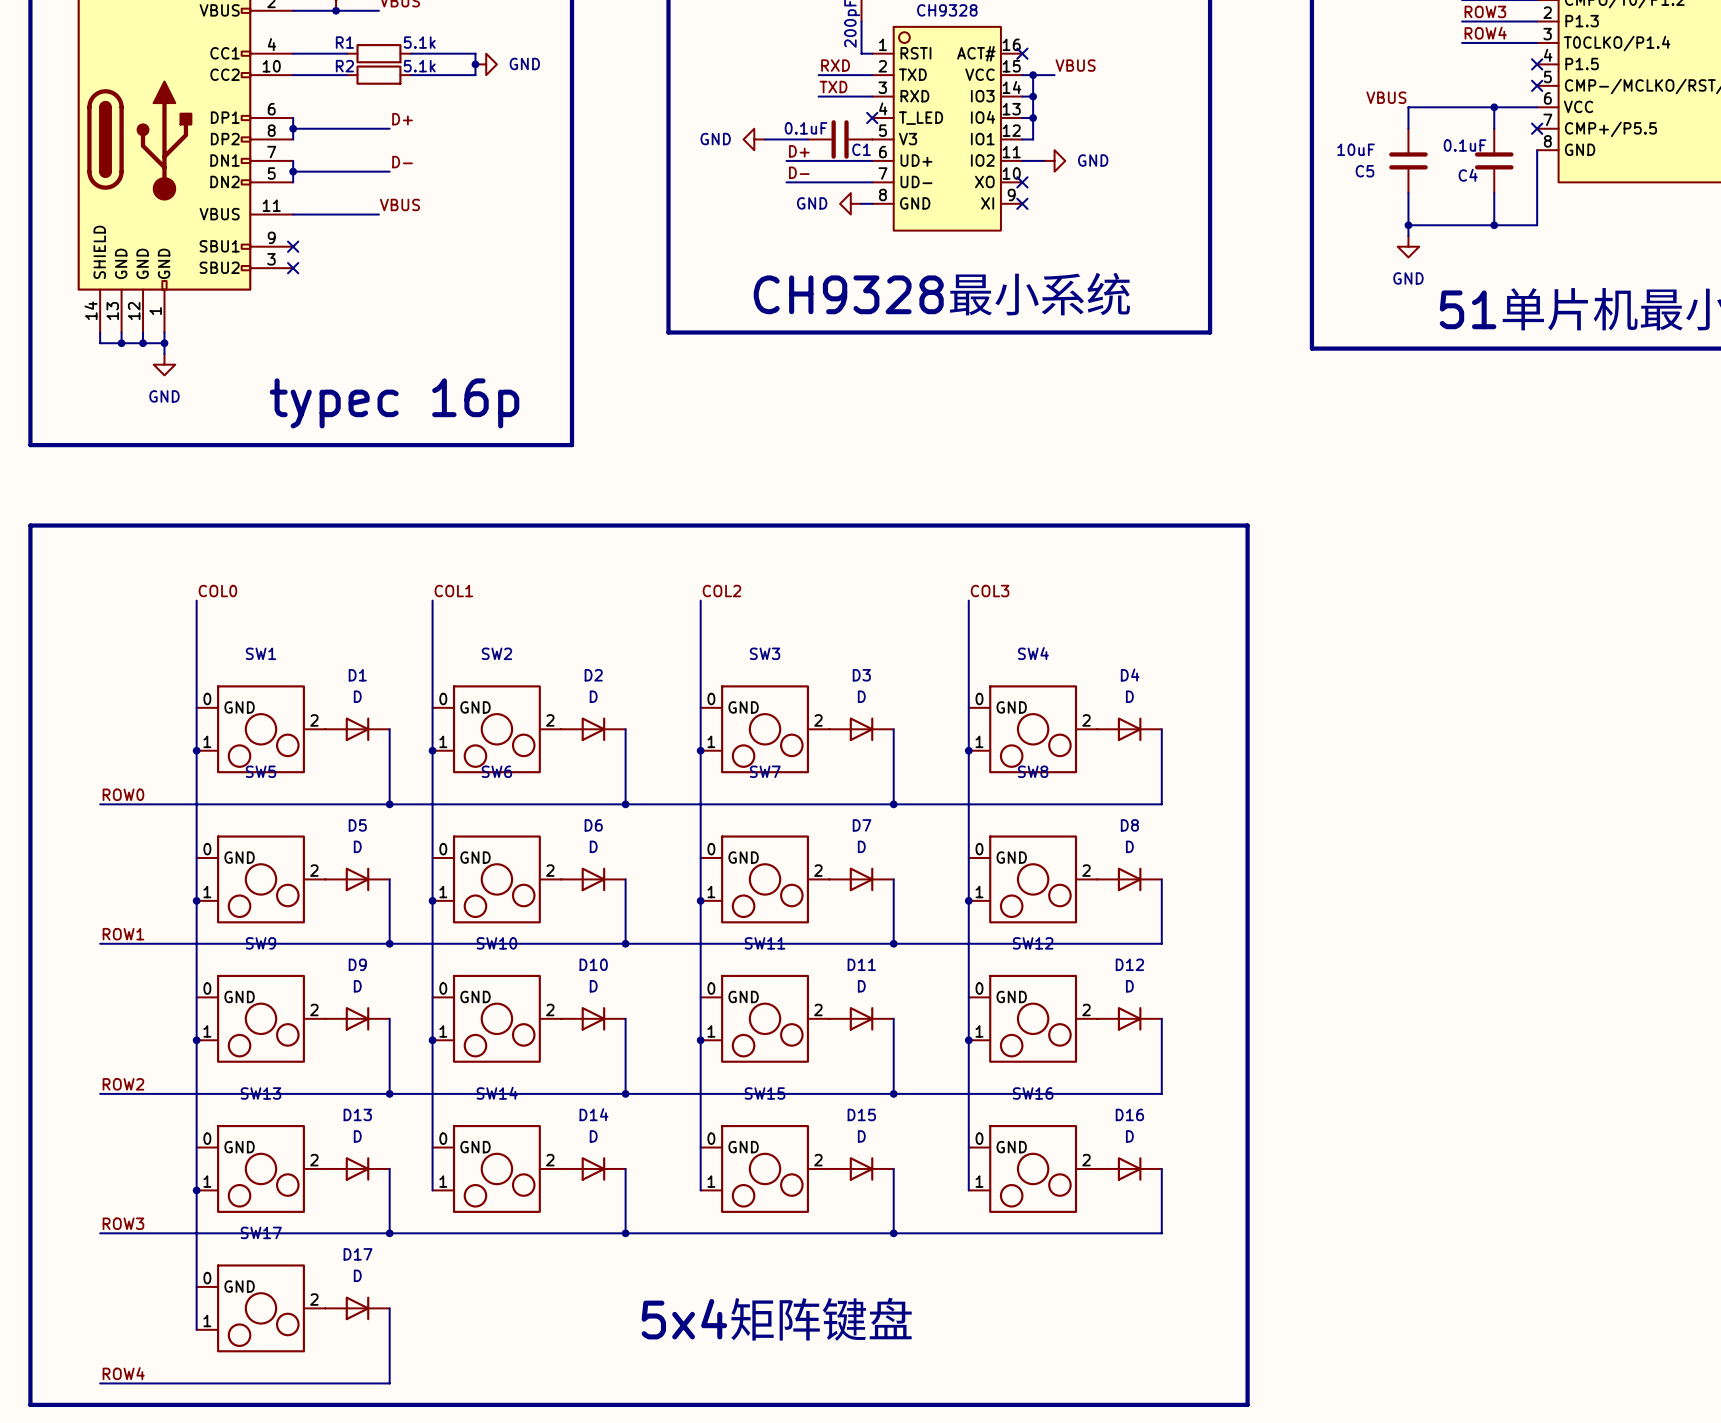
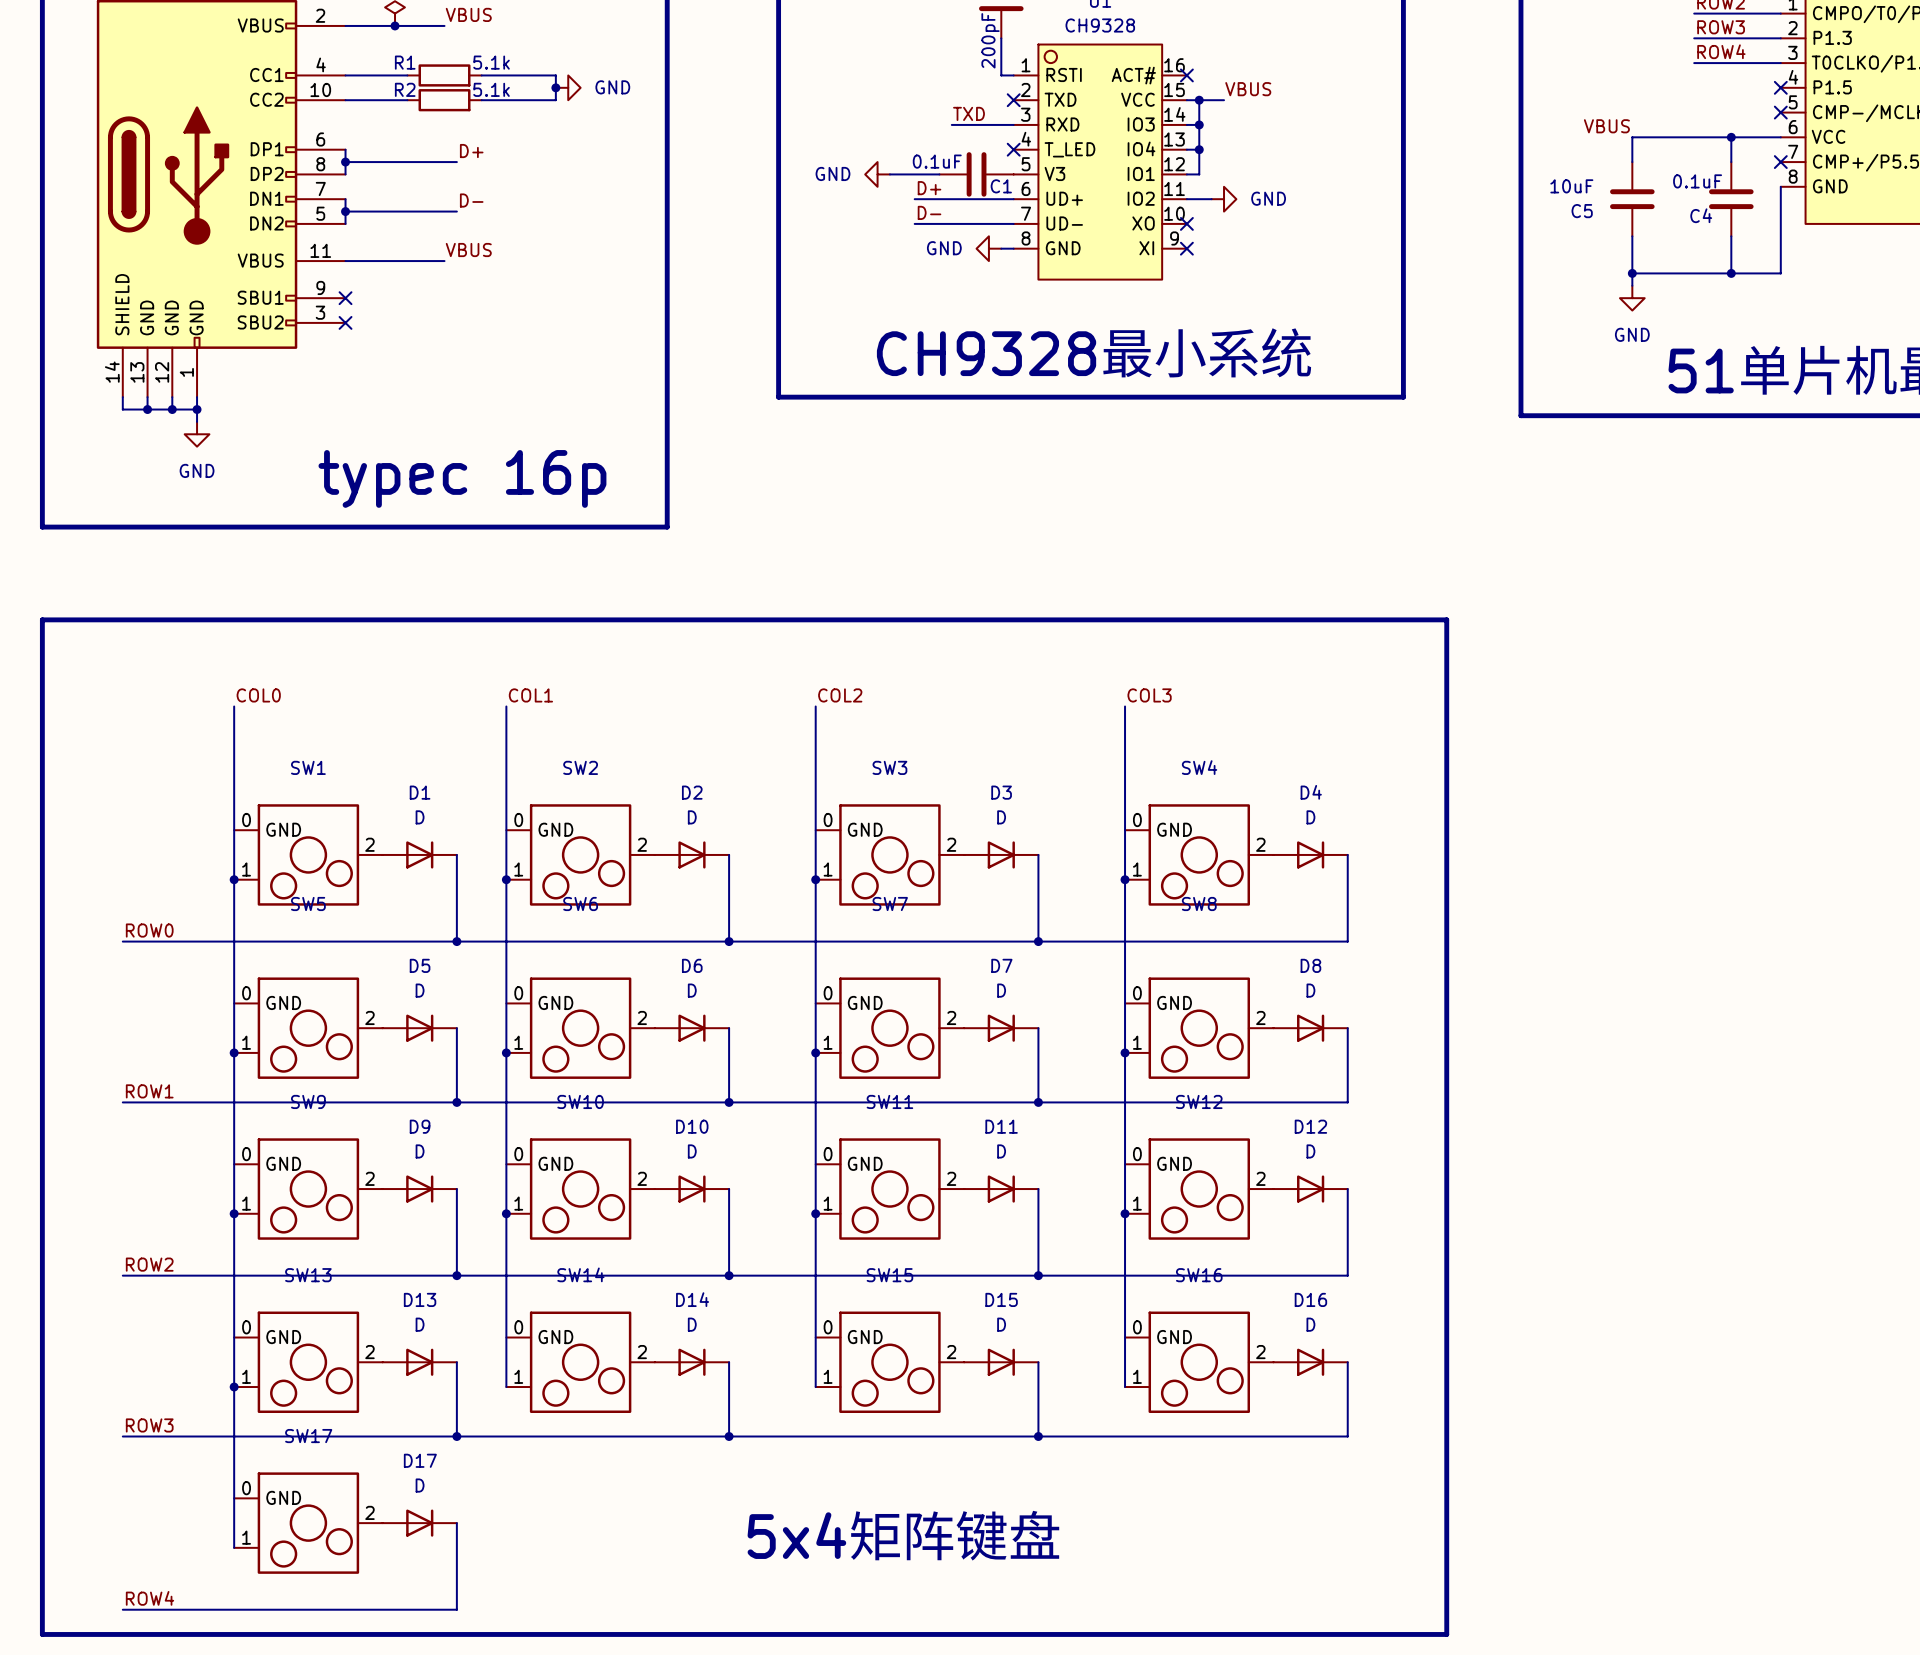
label: RXD (835, 65) -> none
wire: (818, 75) (872, 75) -> none
no-connect mark: none -> (1013, 100)

